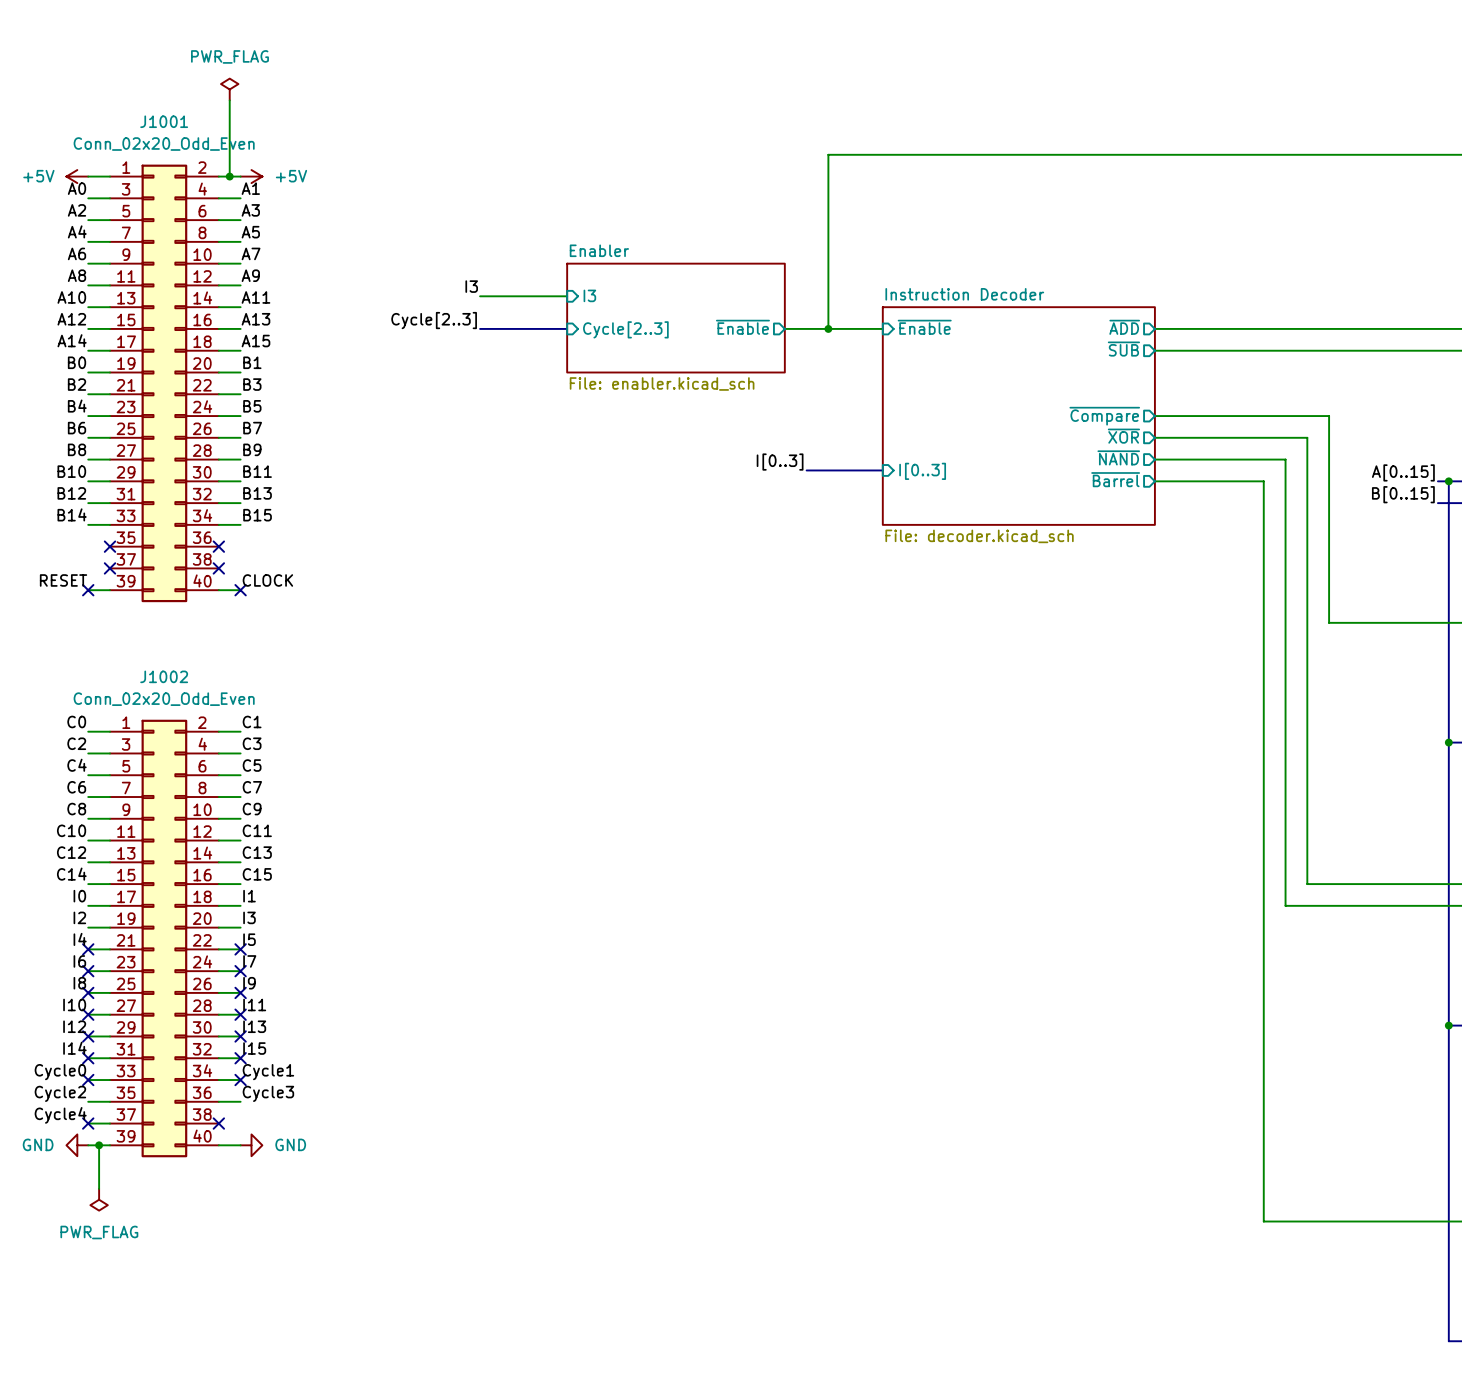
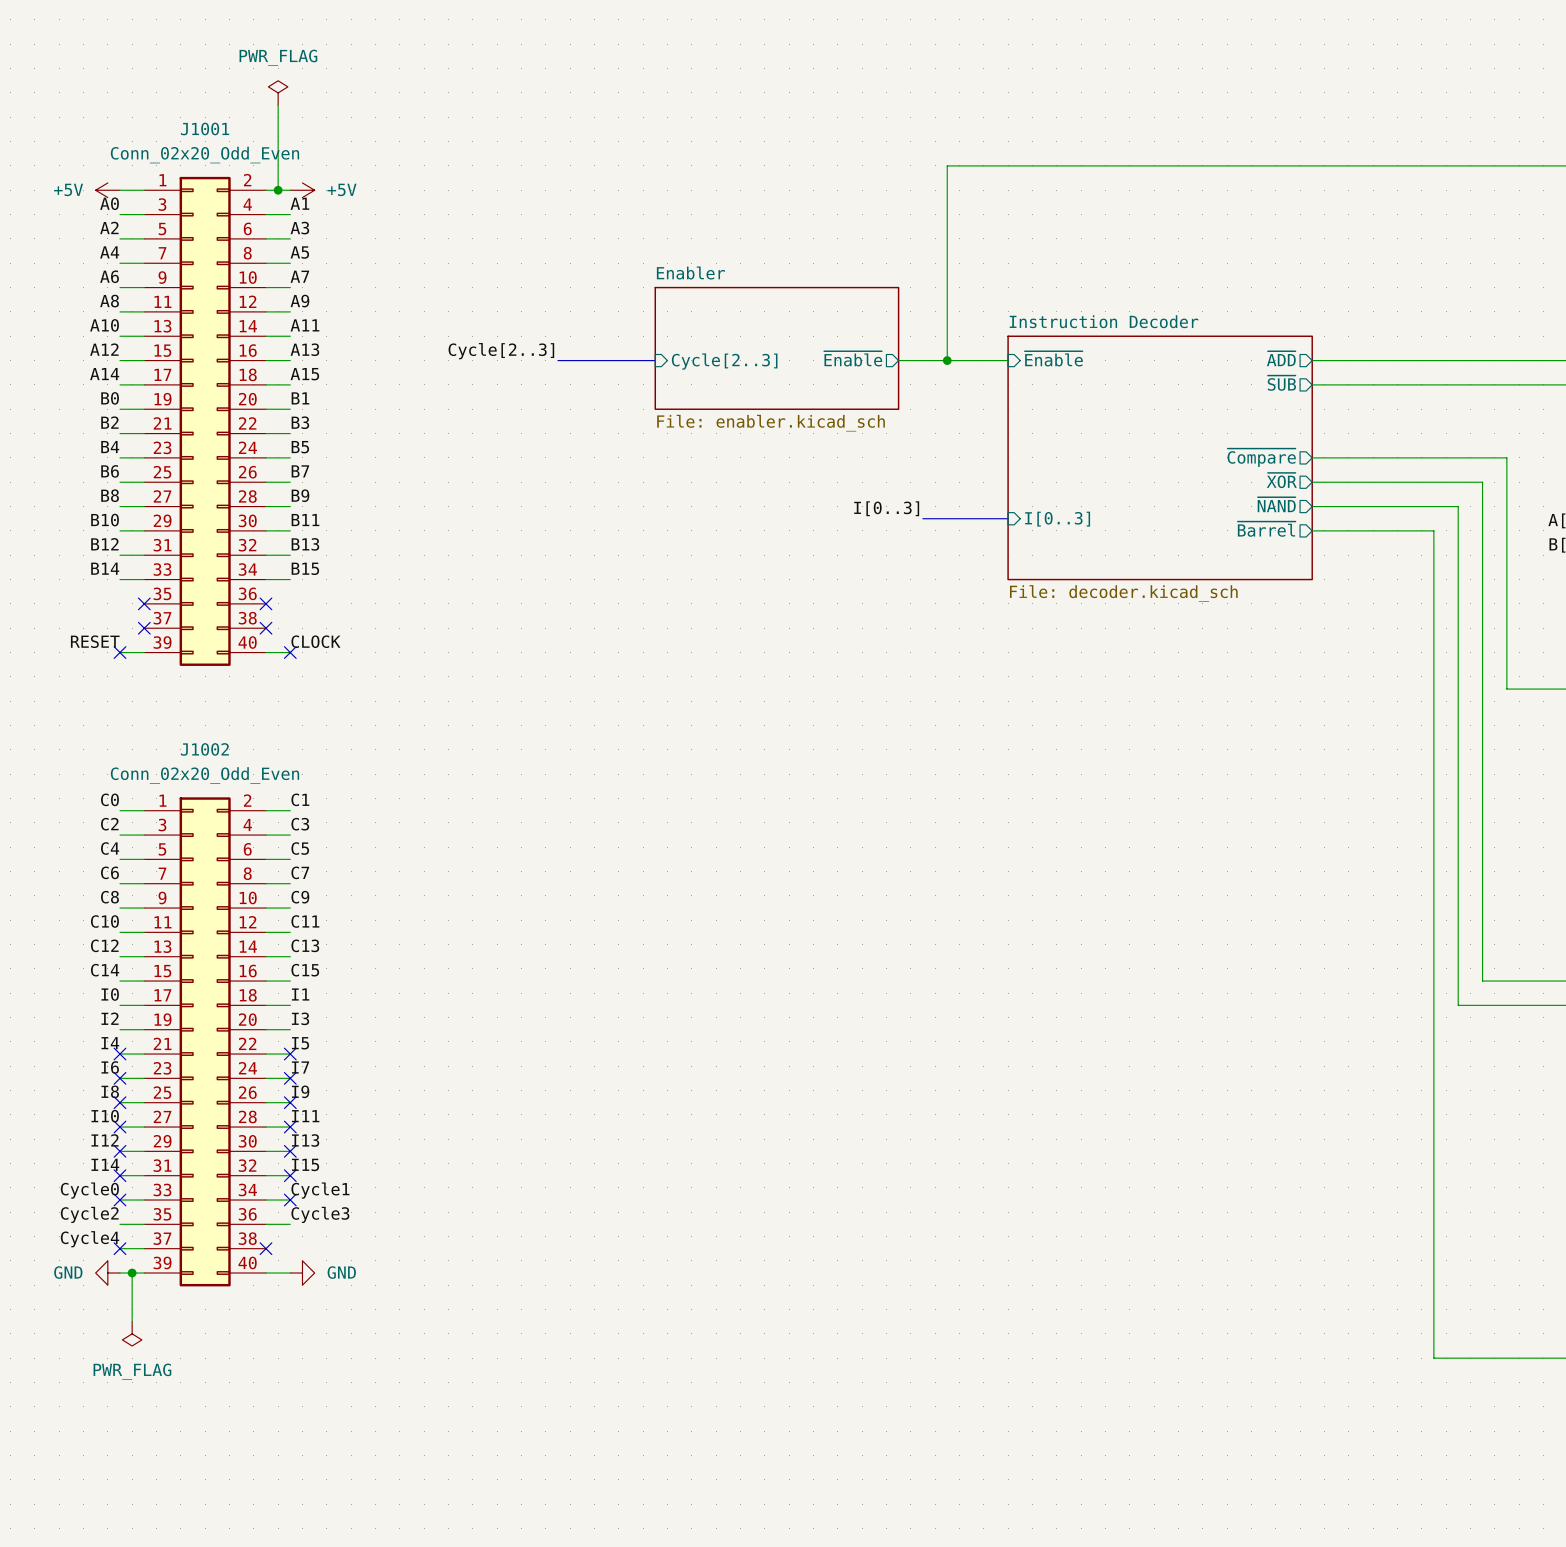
label: I3 (471, 286) -> none
sheet pin: I3 (589, 295) -> none
wire: (480, 296) (567, 296) -> none

